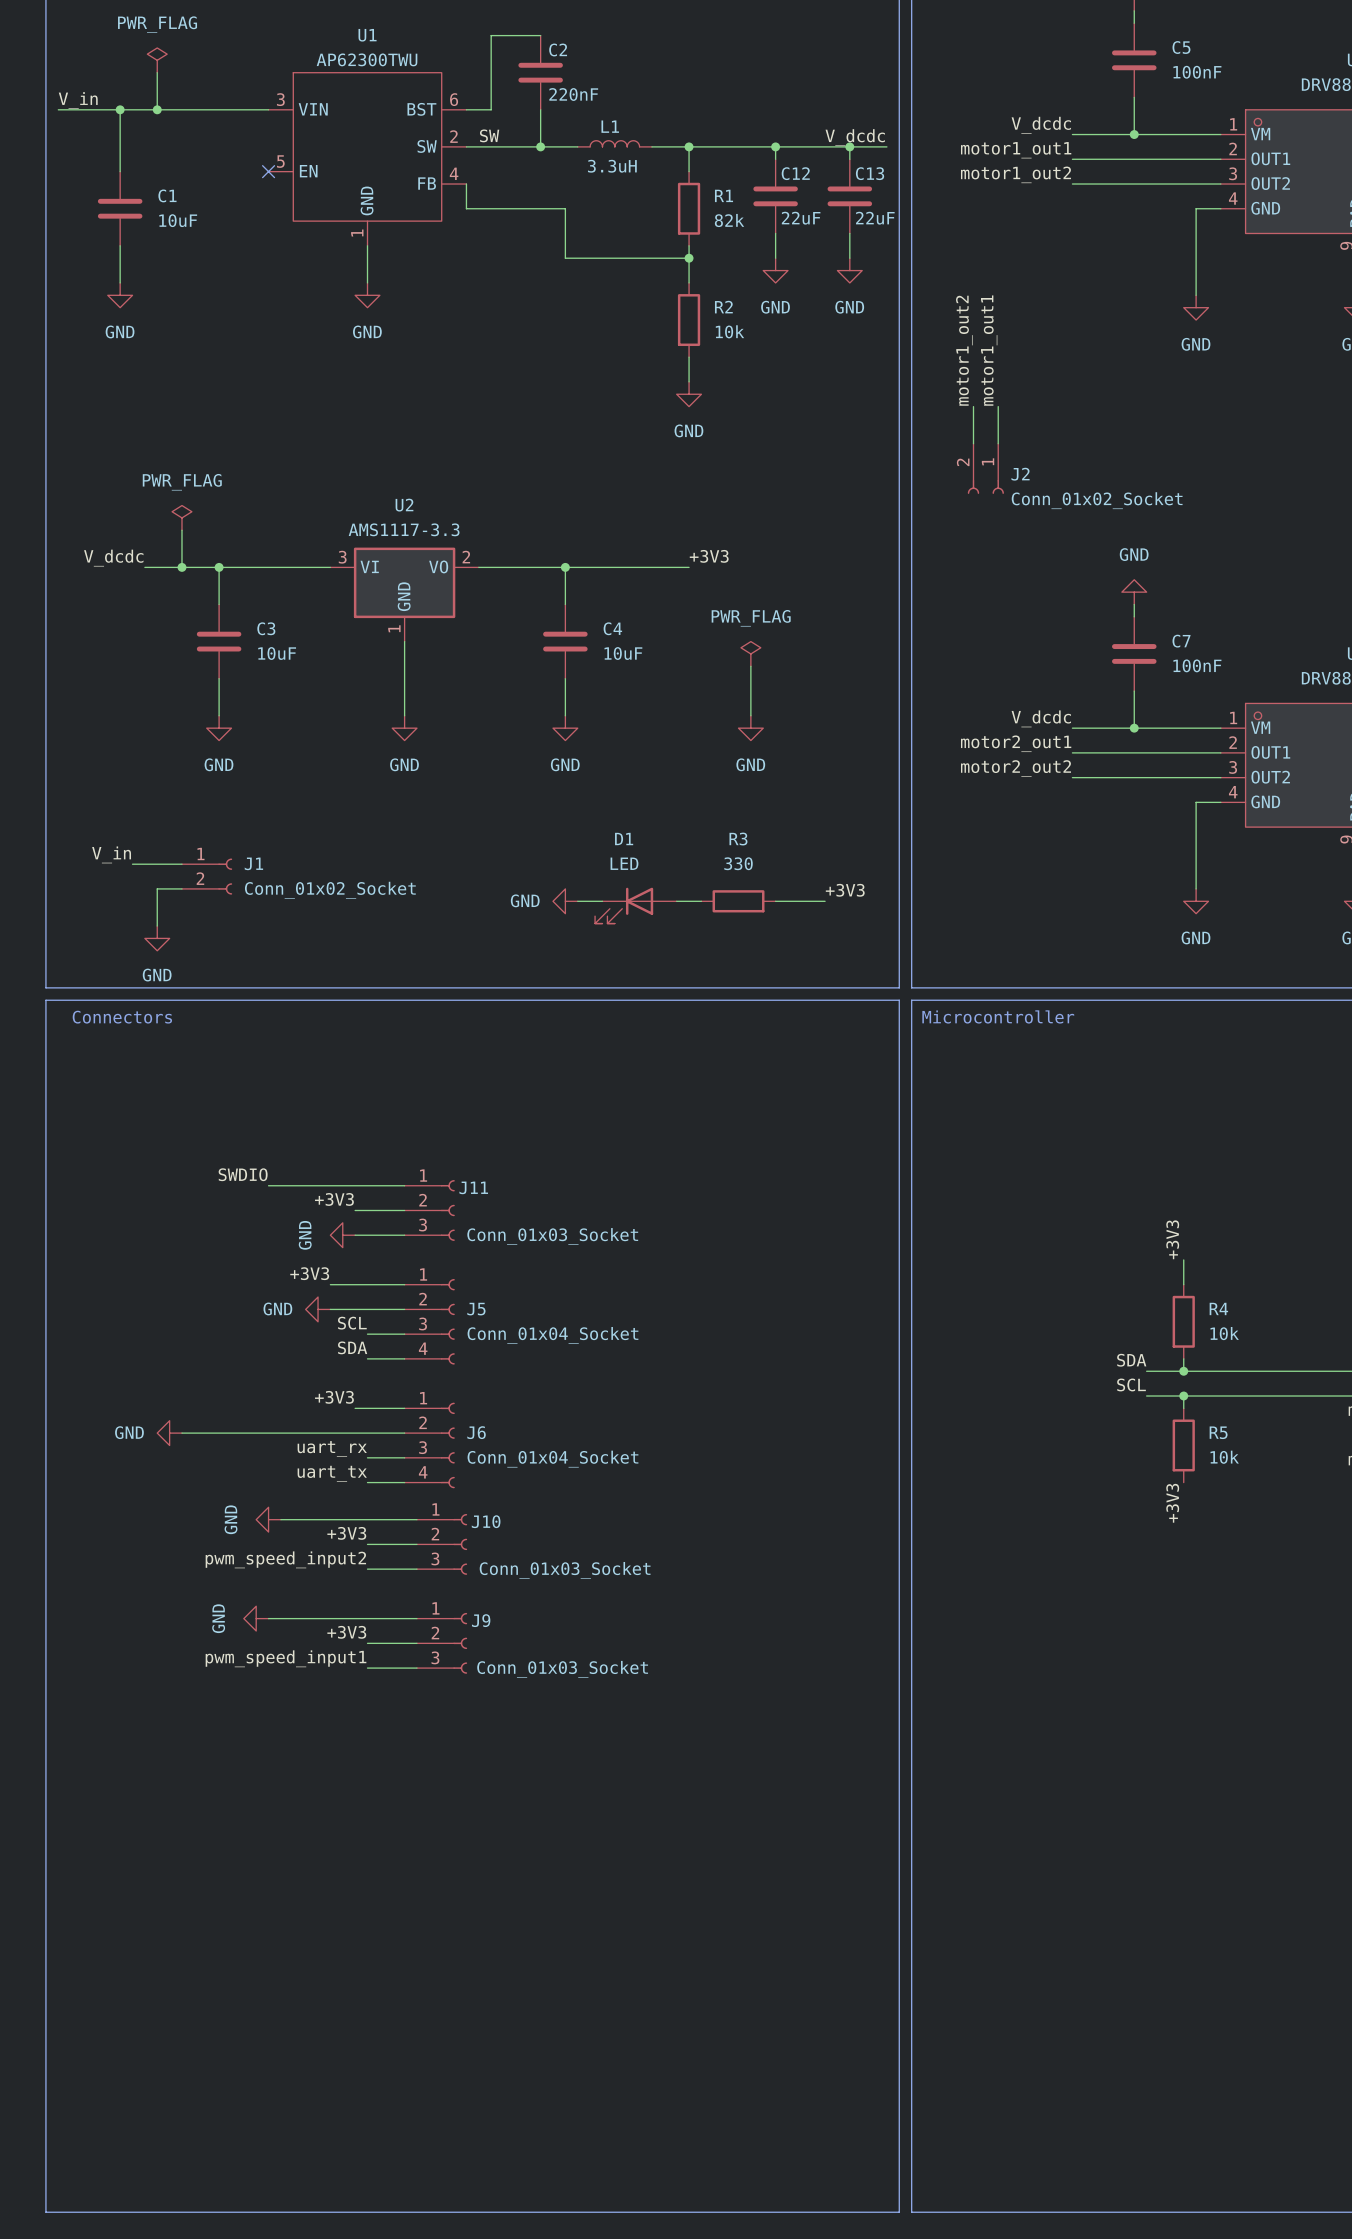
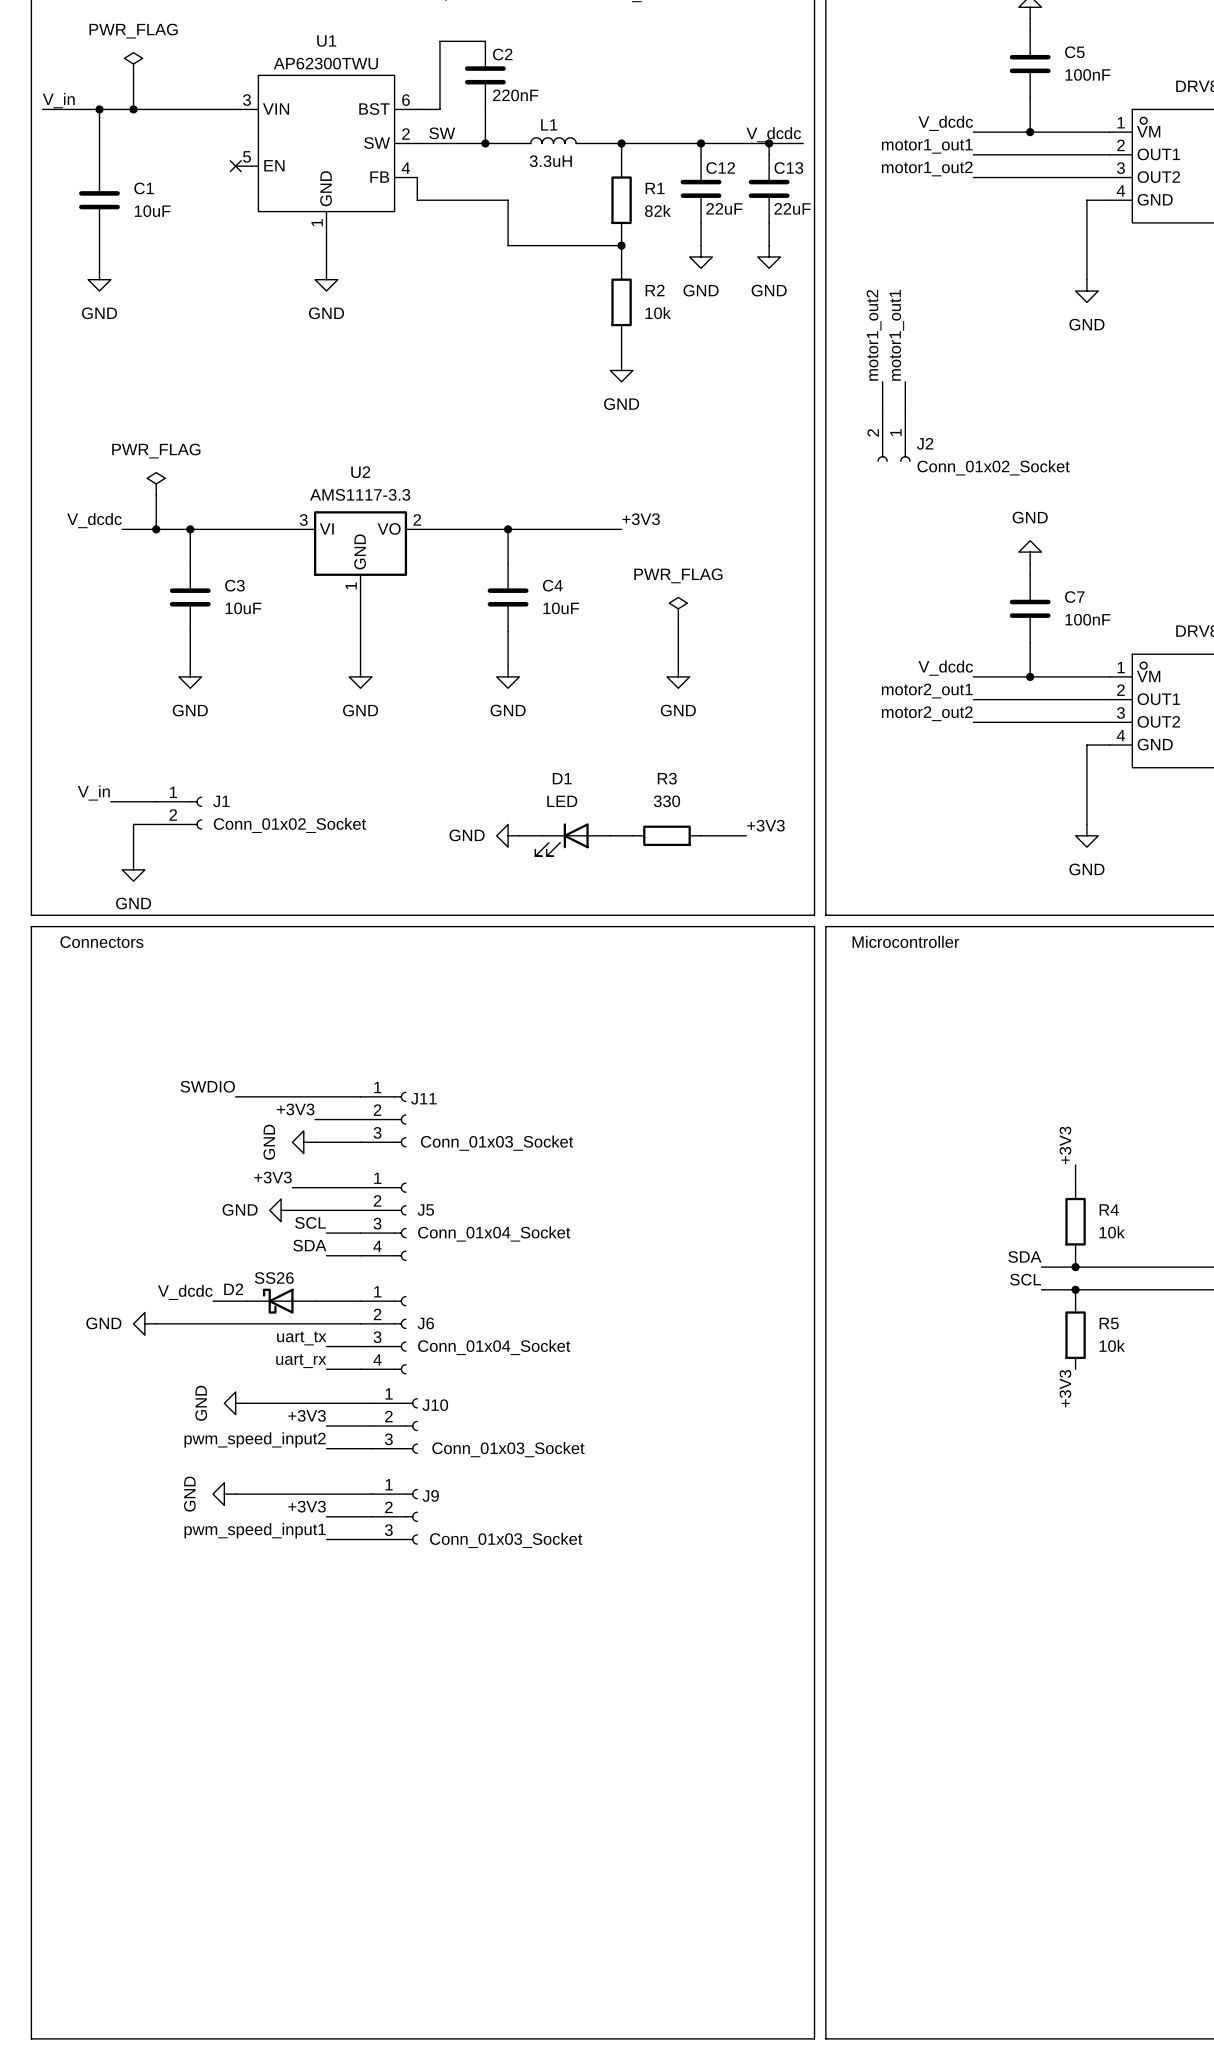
label: +3V3 (334, 1397) -> none
label: none -> V_dcdc (185, 1292)
wire: none -> (212, 1301) (247, 1301)
D2: none -> SS26 (281, 1301)
label: uart_rx (332, 1449) -> uart_tx (301, 1338)
label: uart_tx (332, 1473) -> uart_rx (301, 1361)

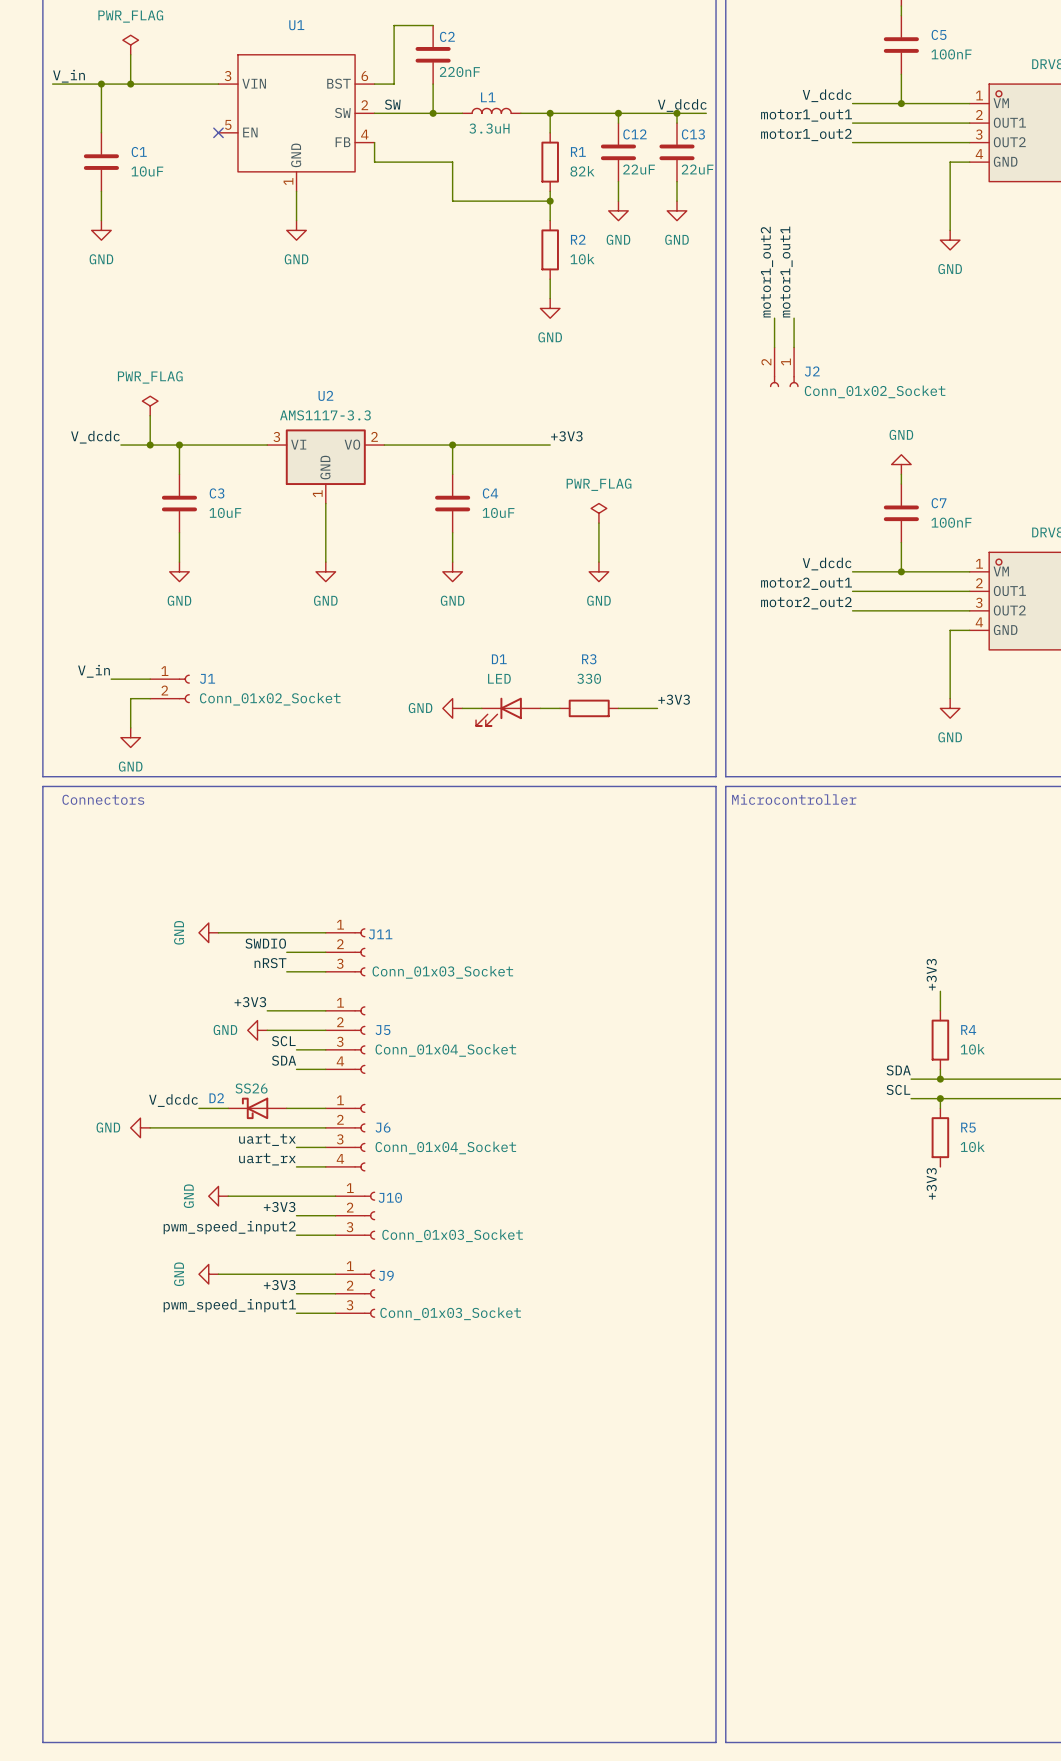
U1 value: AP62300TWU (325, 63) -> none
label: SWDIO (207, 1086) -> none
label: +3V3 (295, 1109) -> SWDIO (265, 943)
label: none -> nRST (270, 963)
power symbol position: GND (303, 1142) -> GND (208, 932)

